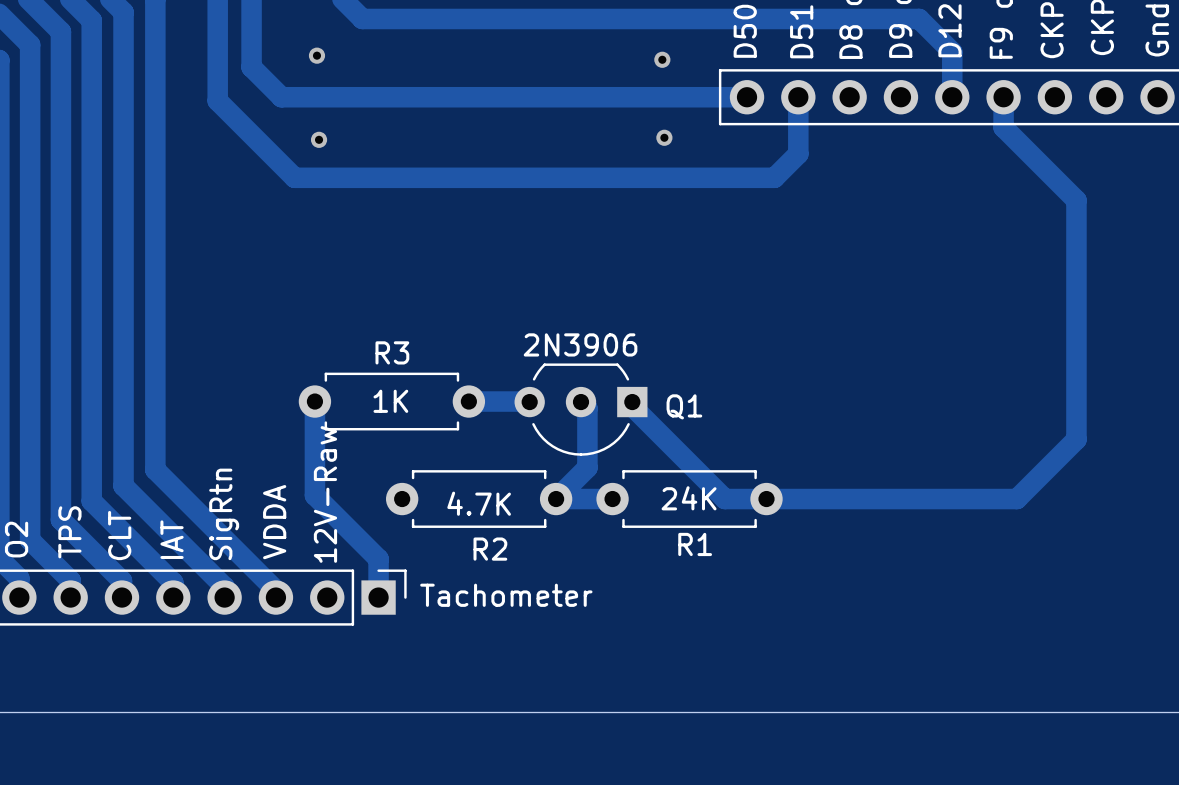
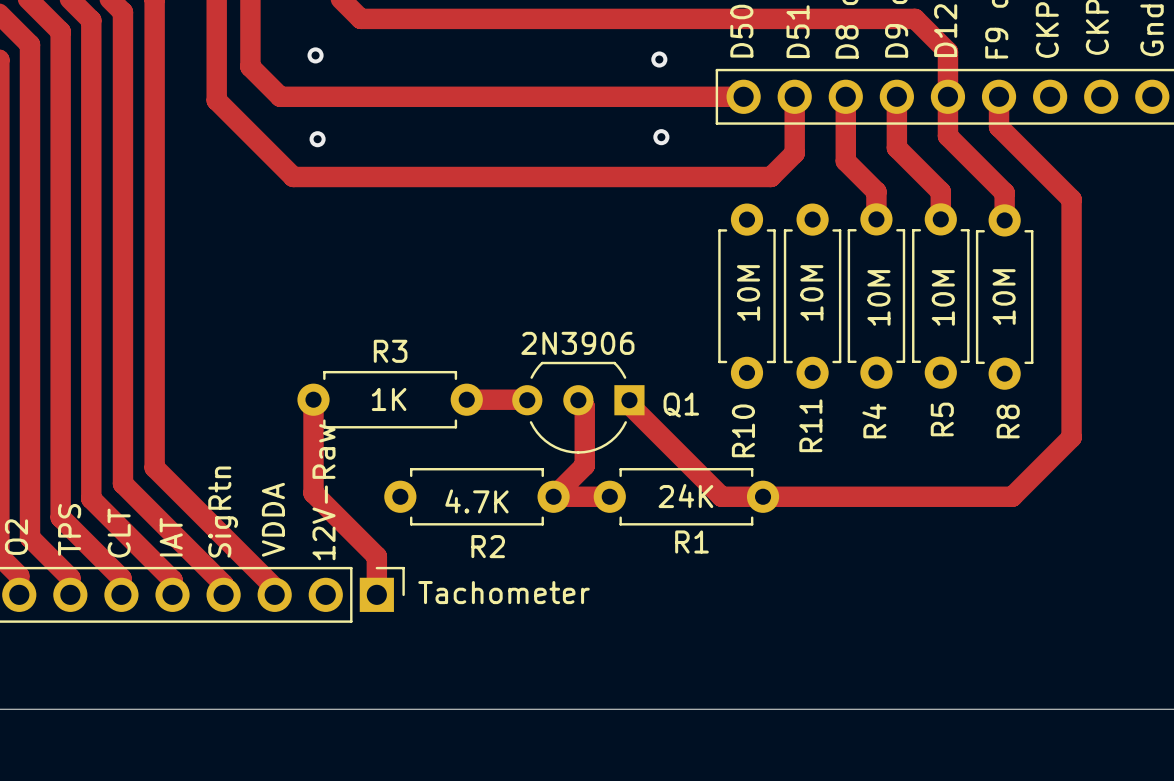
track: none -> (845, 96) (845, 161) (876, 191) (876, 219)
track: none -> (896, 96) (896, 147) (940, 191) (940, 219)
track: none -> (947, 96) (947, 136) (1004, 192) (1004, 220)
R10: none -> 10M (746, 296)
R11: none -> 10M (812, 296)
R4: none -> 10M (876, 296)
R5: none -> 10M (940, 296)
R8: none -> 10M (1004, 297)

